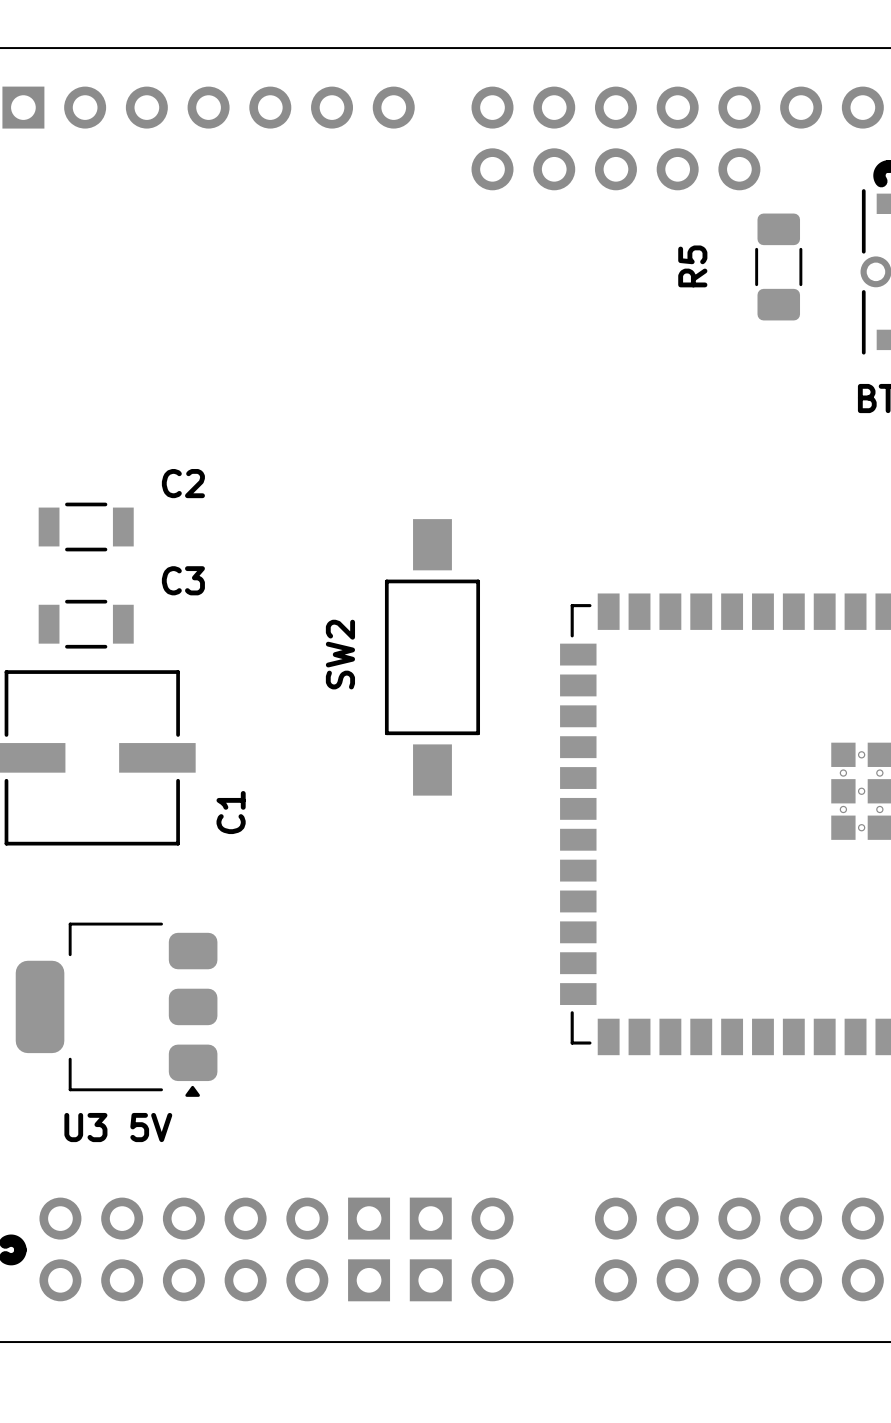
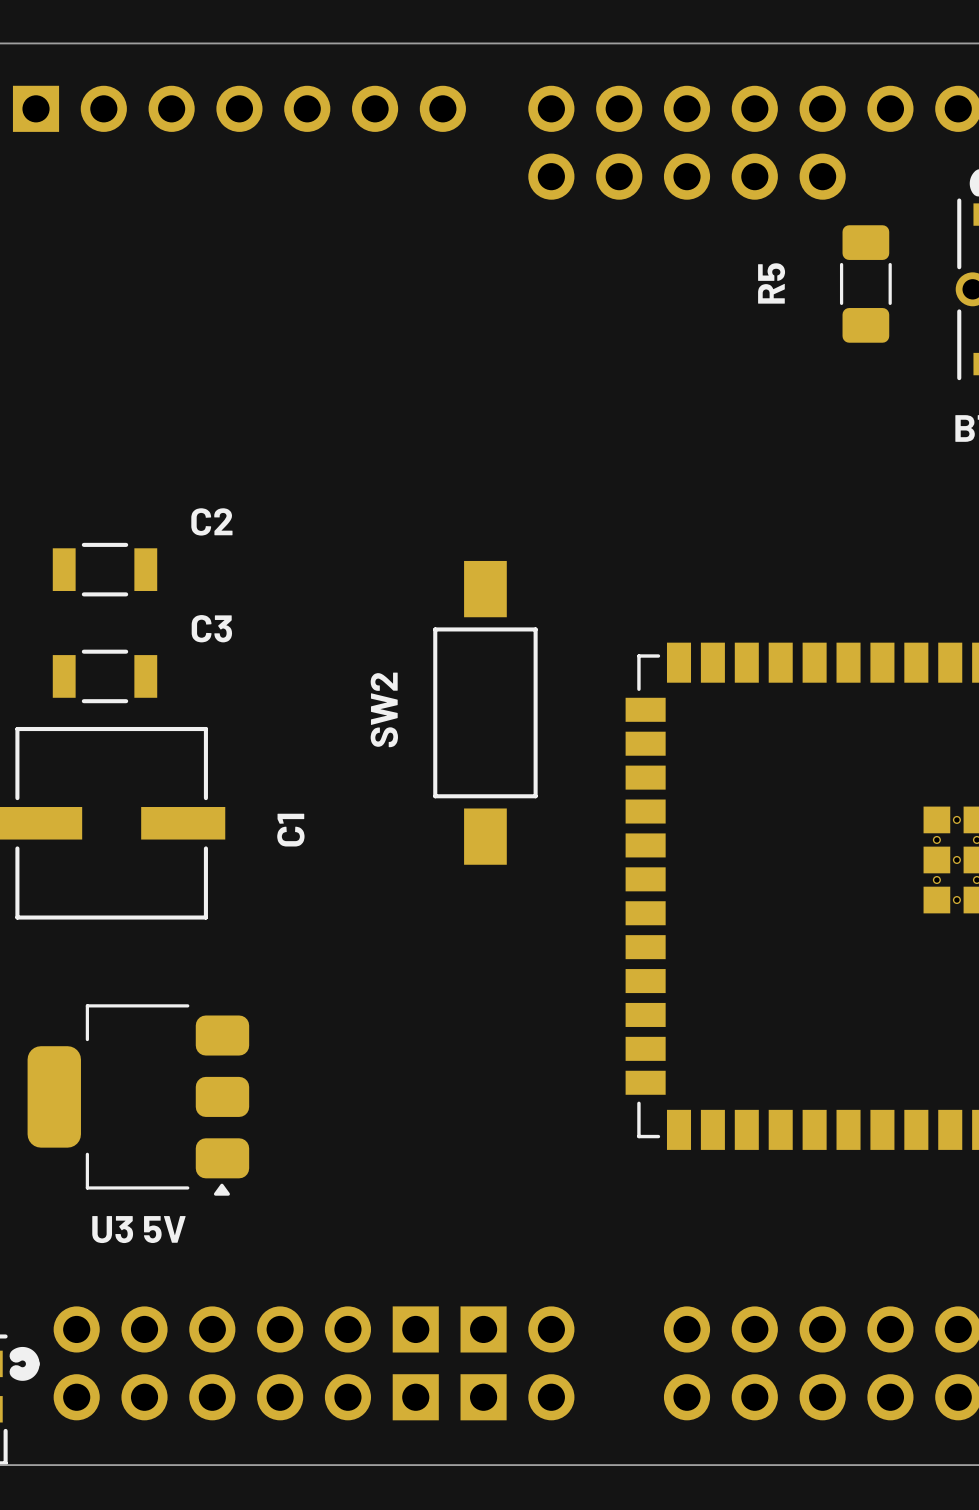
C1 name position: C1 (231, 812) -> C1 (290, 830)

